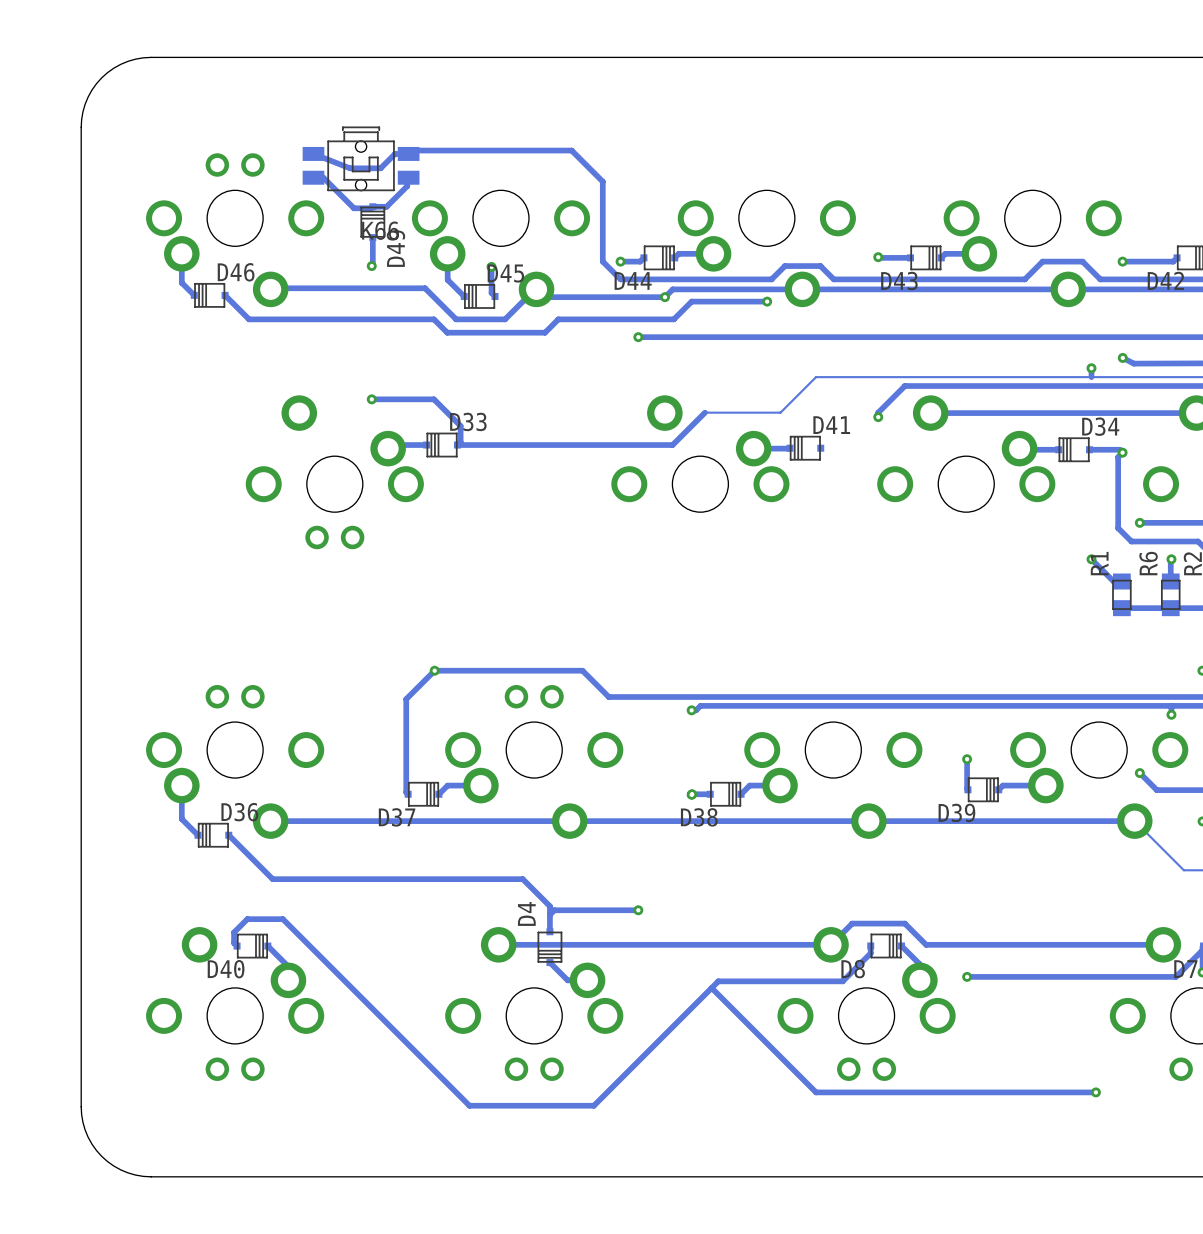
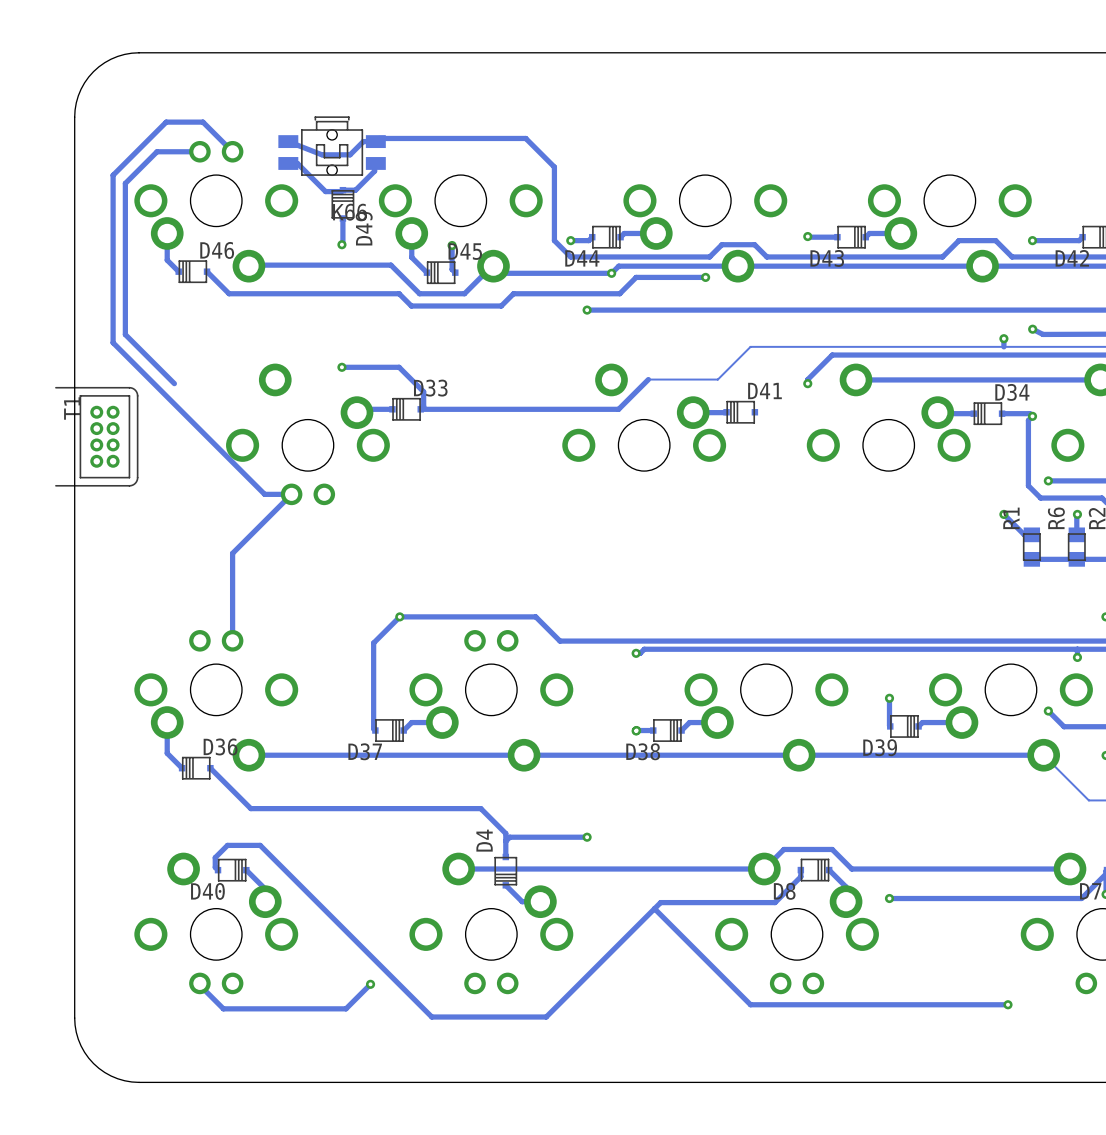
track: none -> (199, 151) (157, 151) (125, 183) (125, 334) (174, 383)
track: none -> (232, 151) (202, 122) (166, 122) (113, 175) (113, 342) (264, 494) (291, 494) (232, 553) (232, 640)
T1: none -> (96, 436)
track: none -> (199, 983) (223, 1008) (346, 1008) (370, 984)
via: none -> (370, 984)

